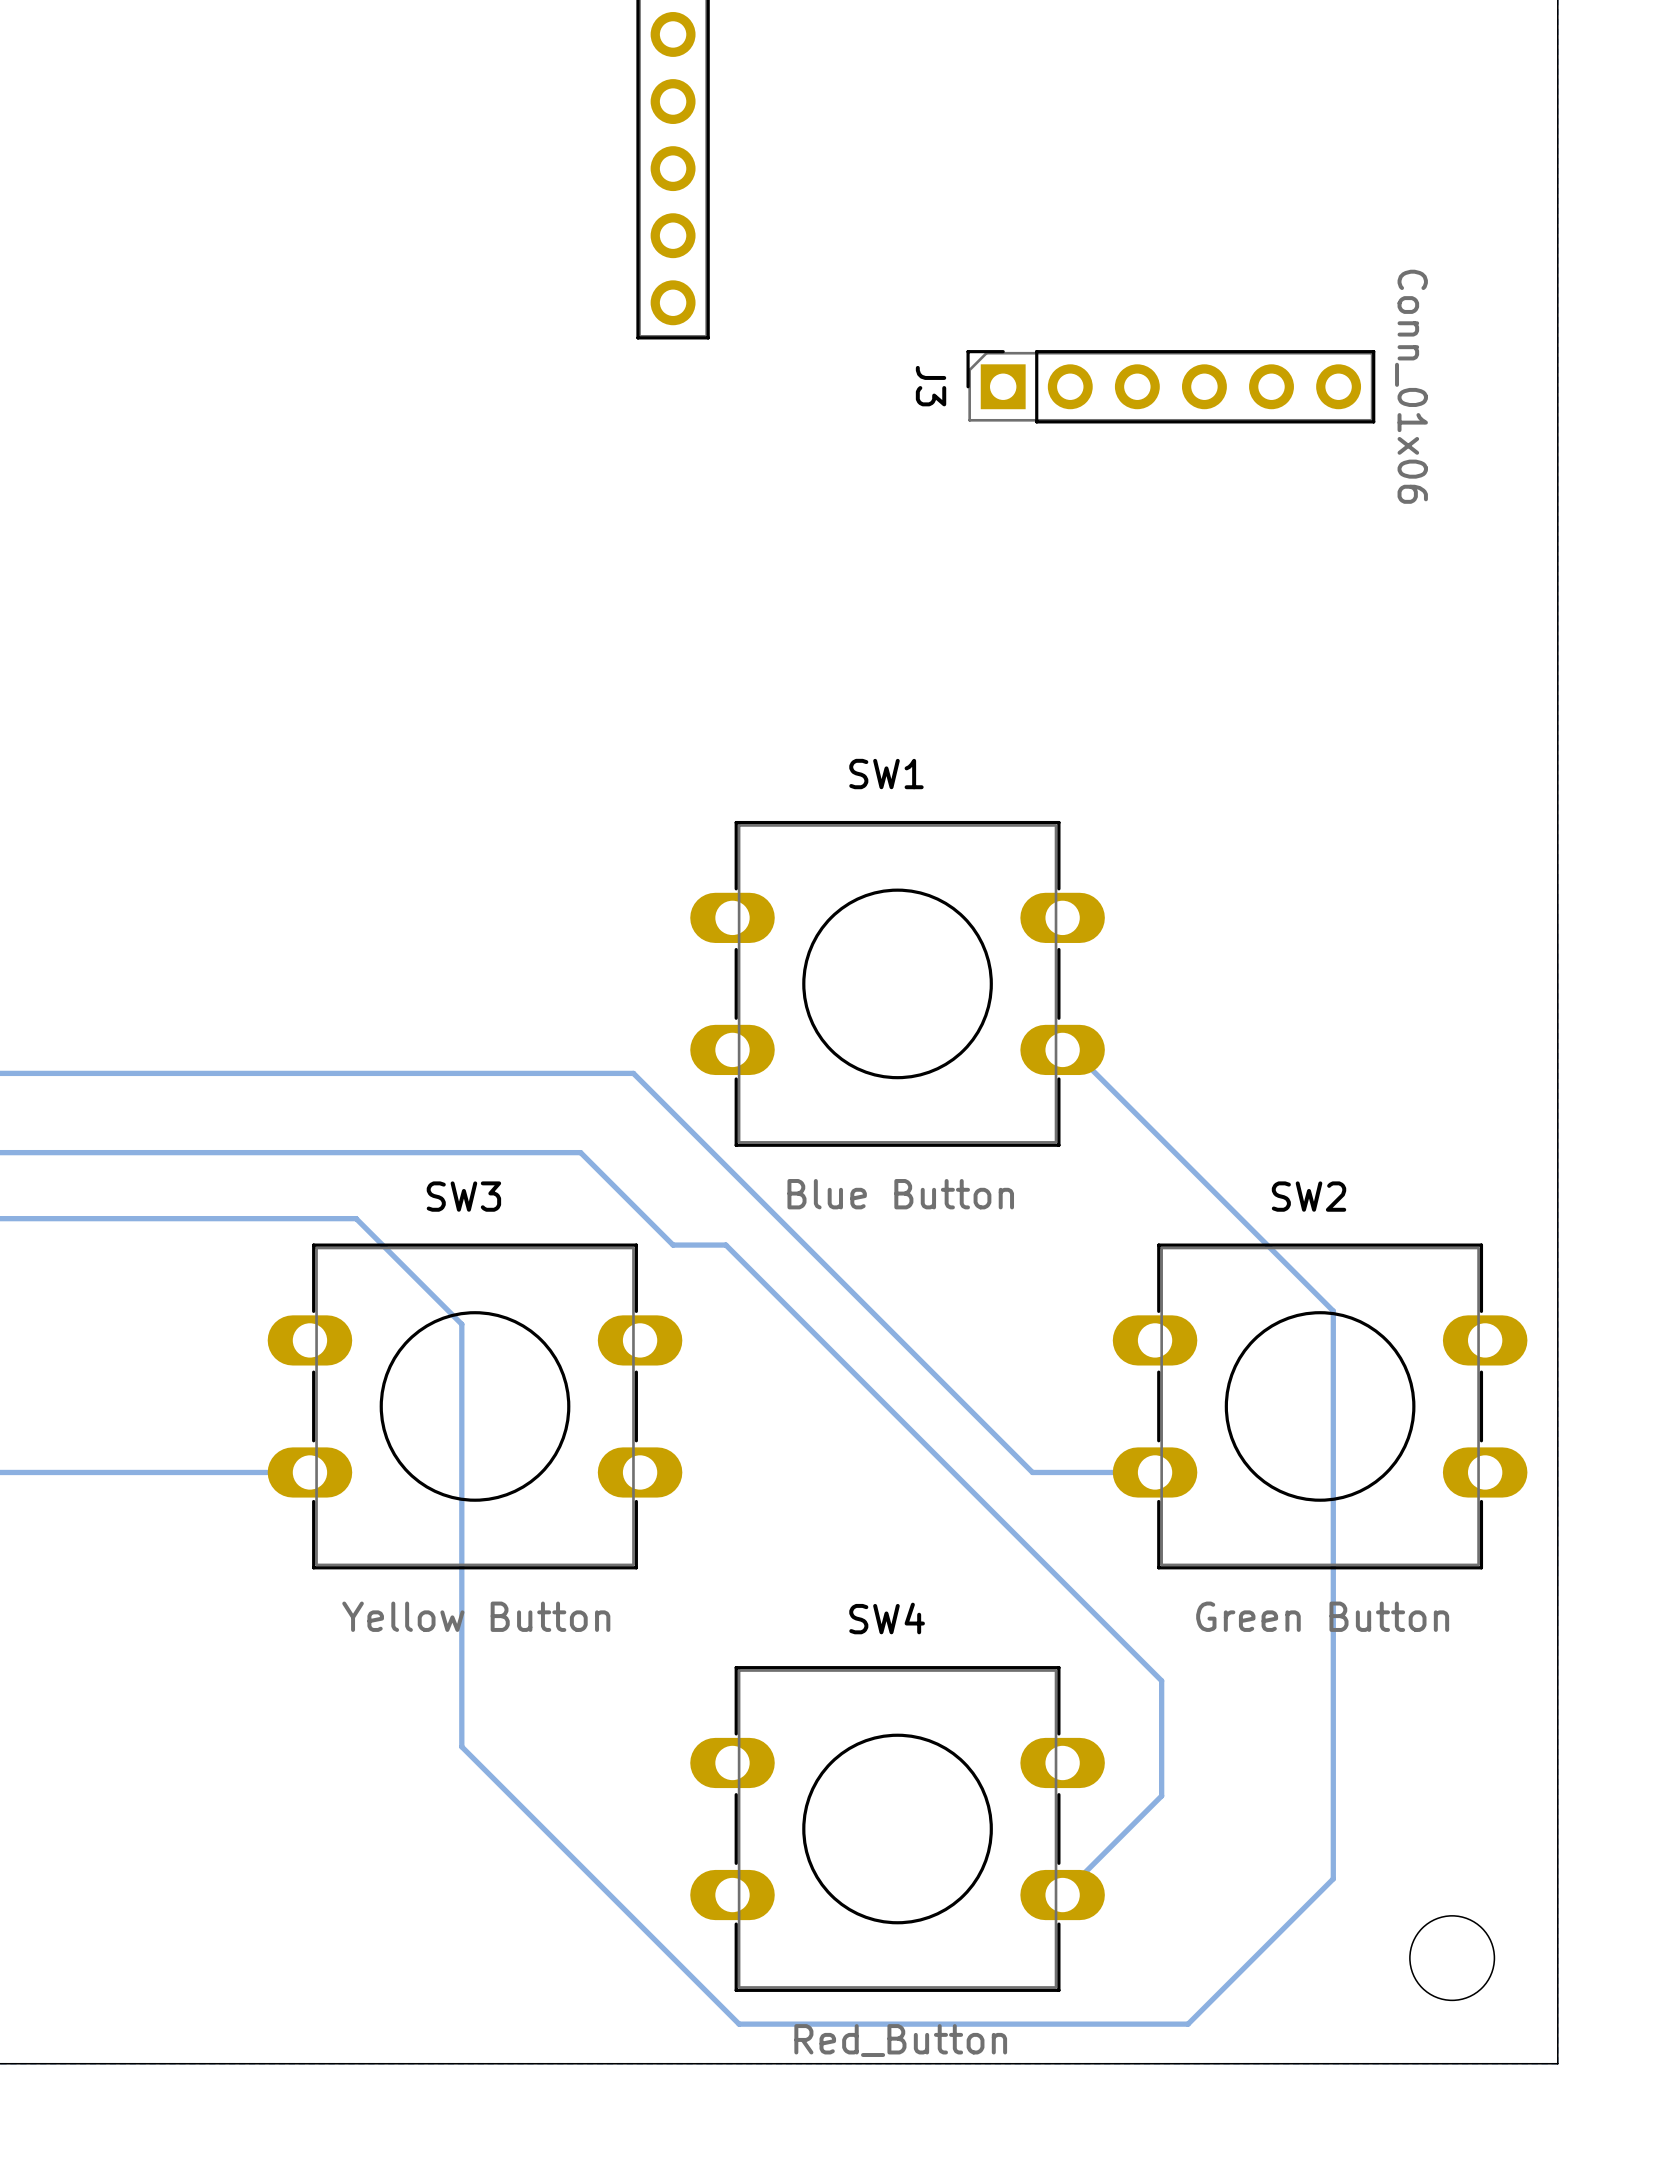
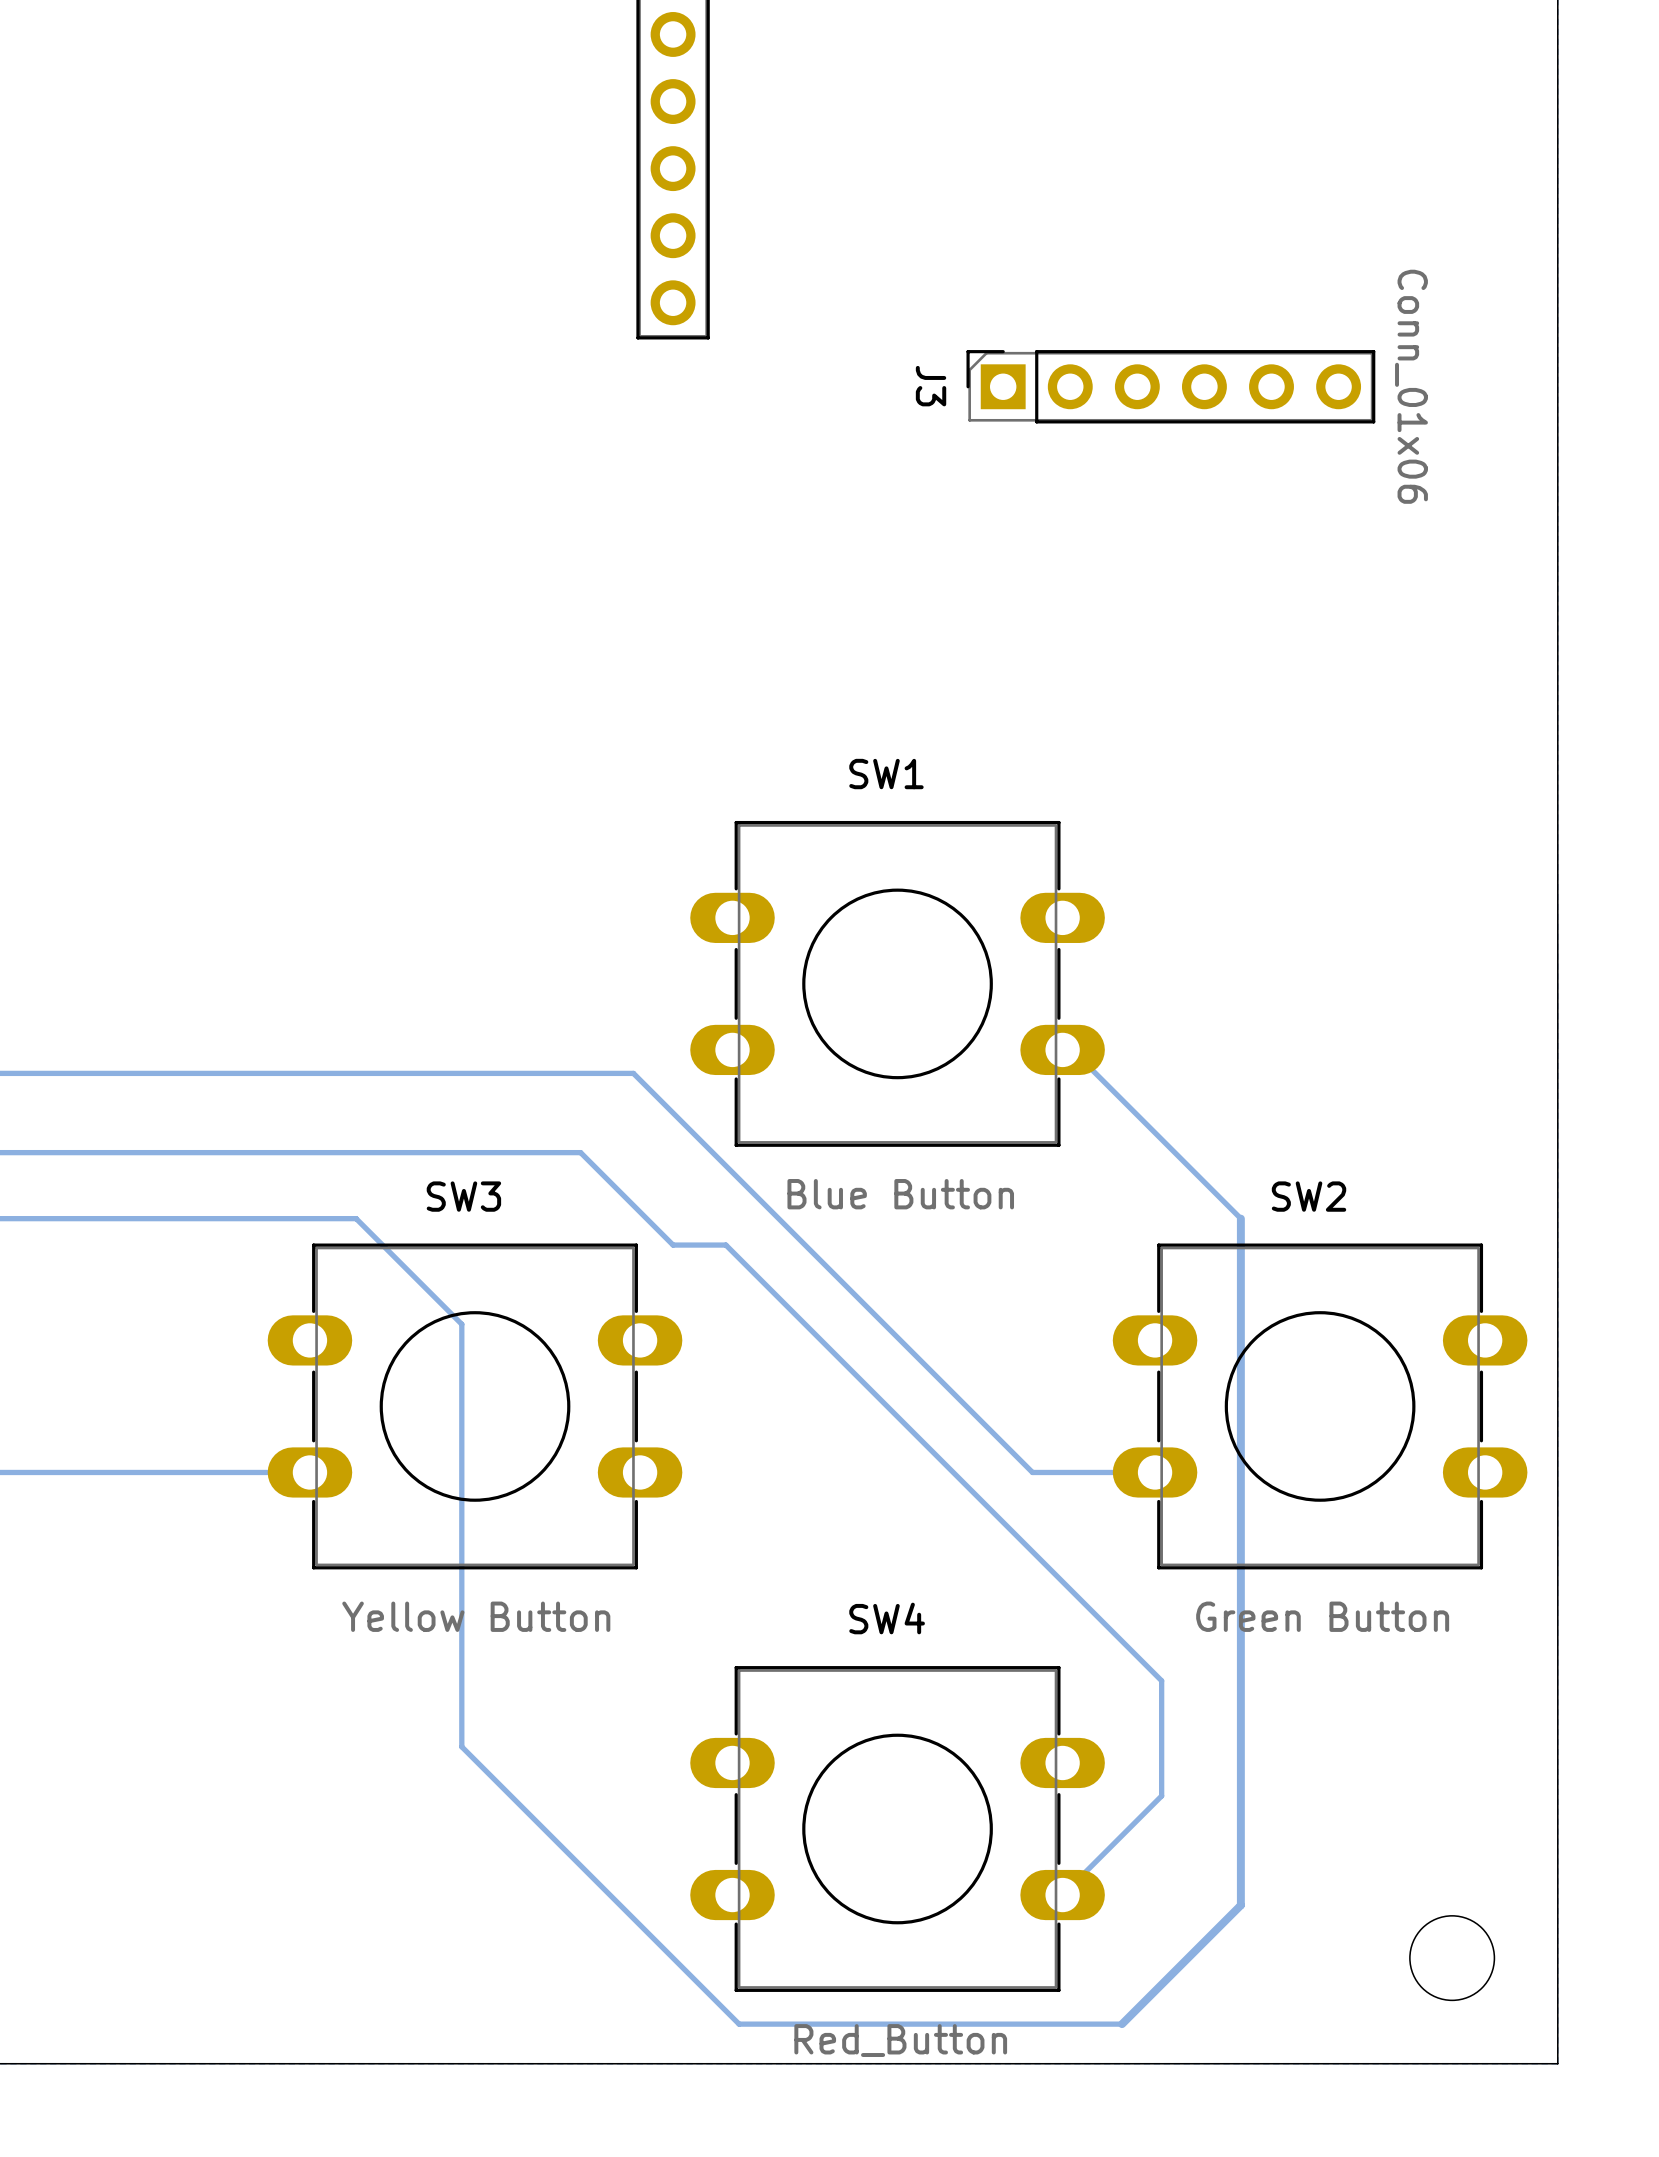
track: (1240, 1218) (1333, 1311) (1333, 1878) (1188, 2024) (1122, 2024) -> (1240, 1218) (1240, 1905) (1122, 2024)

